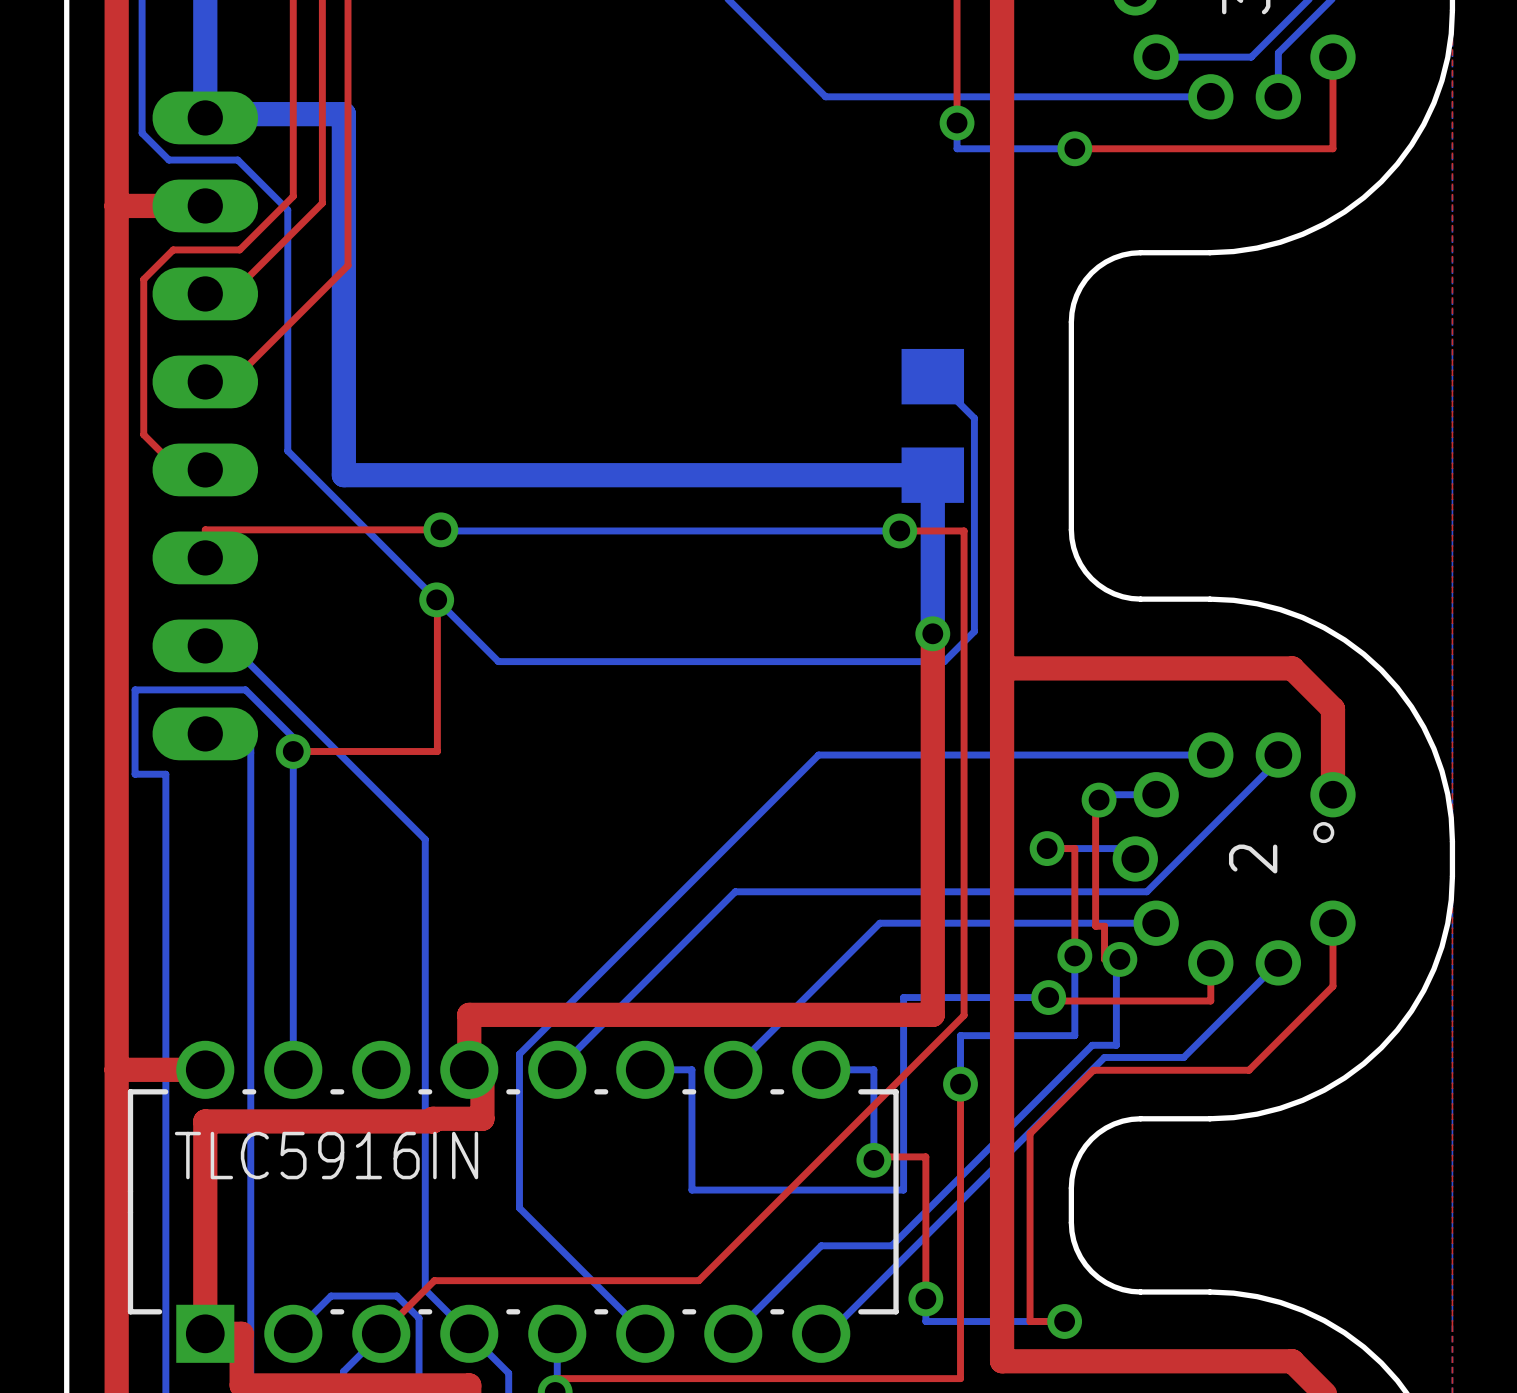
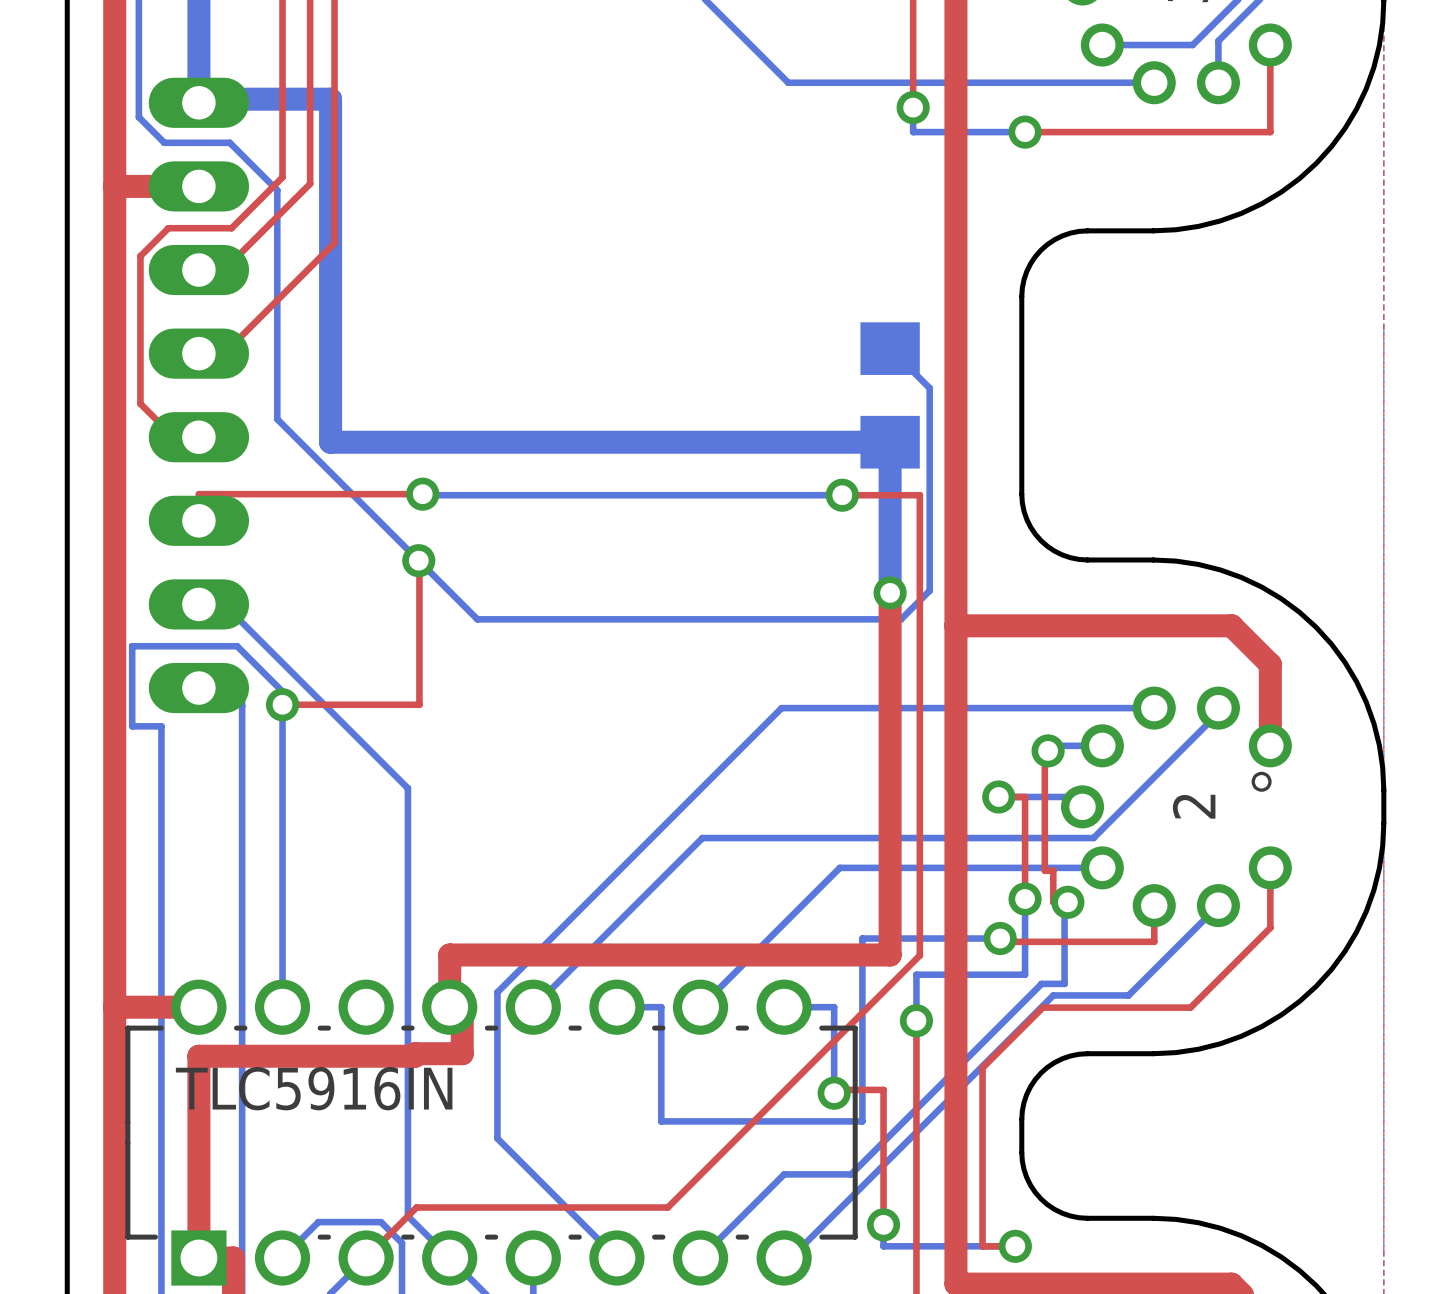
via position: (899, 530) -> (842, 495)

